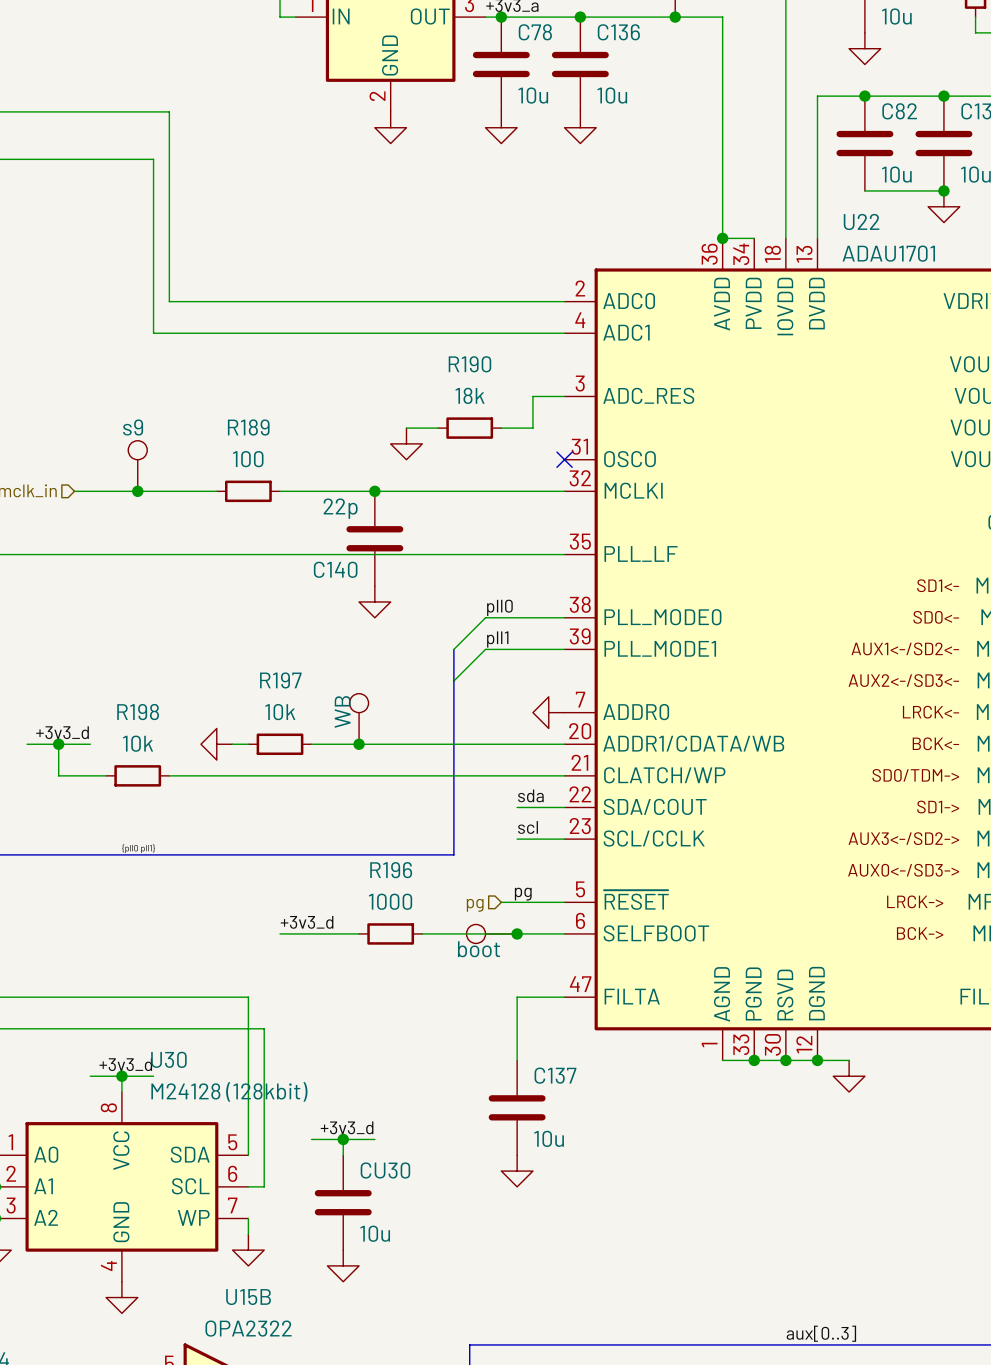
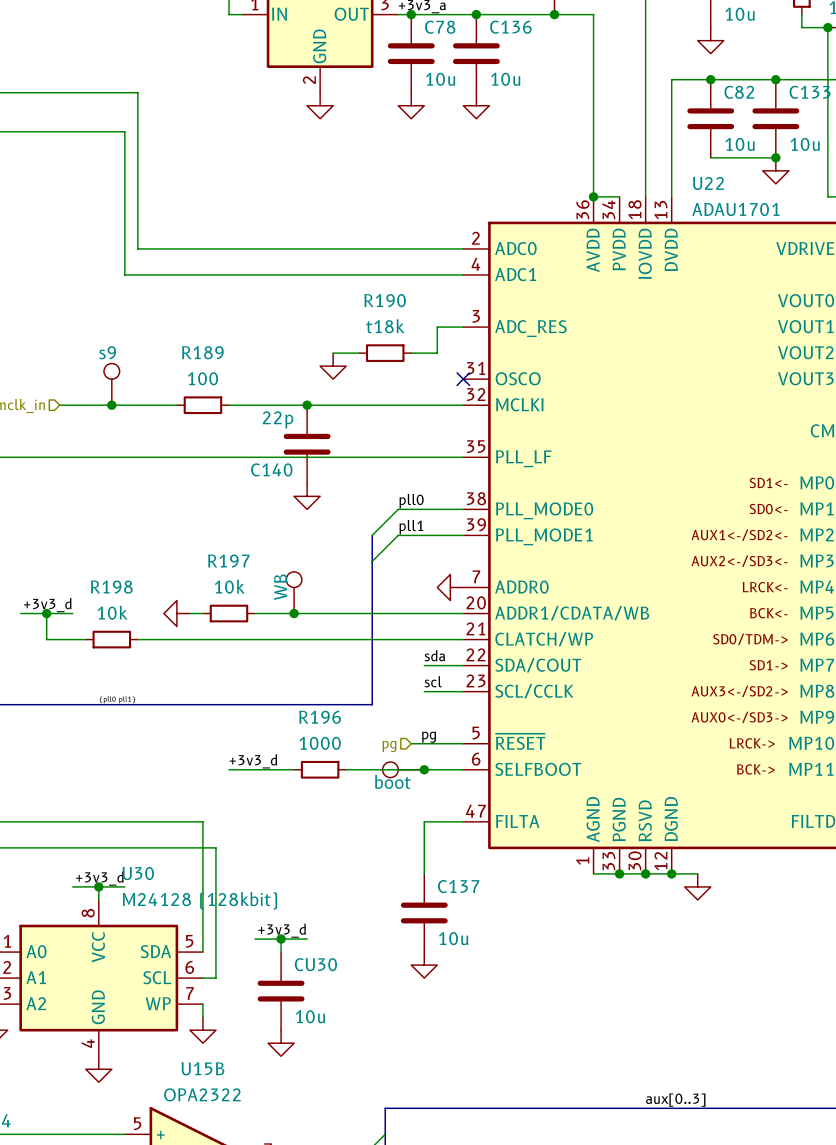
R190 value: 18k (470, 395) -> t18k (385, 326)

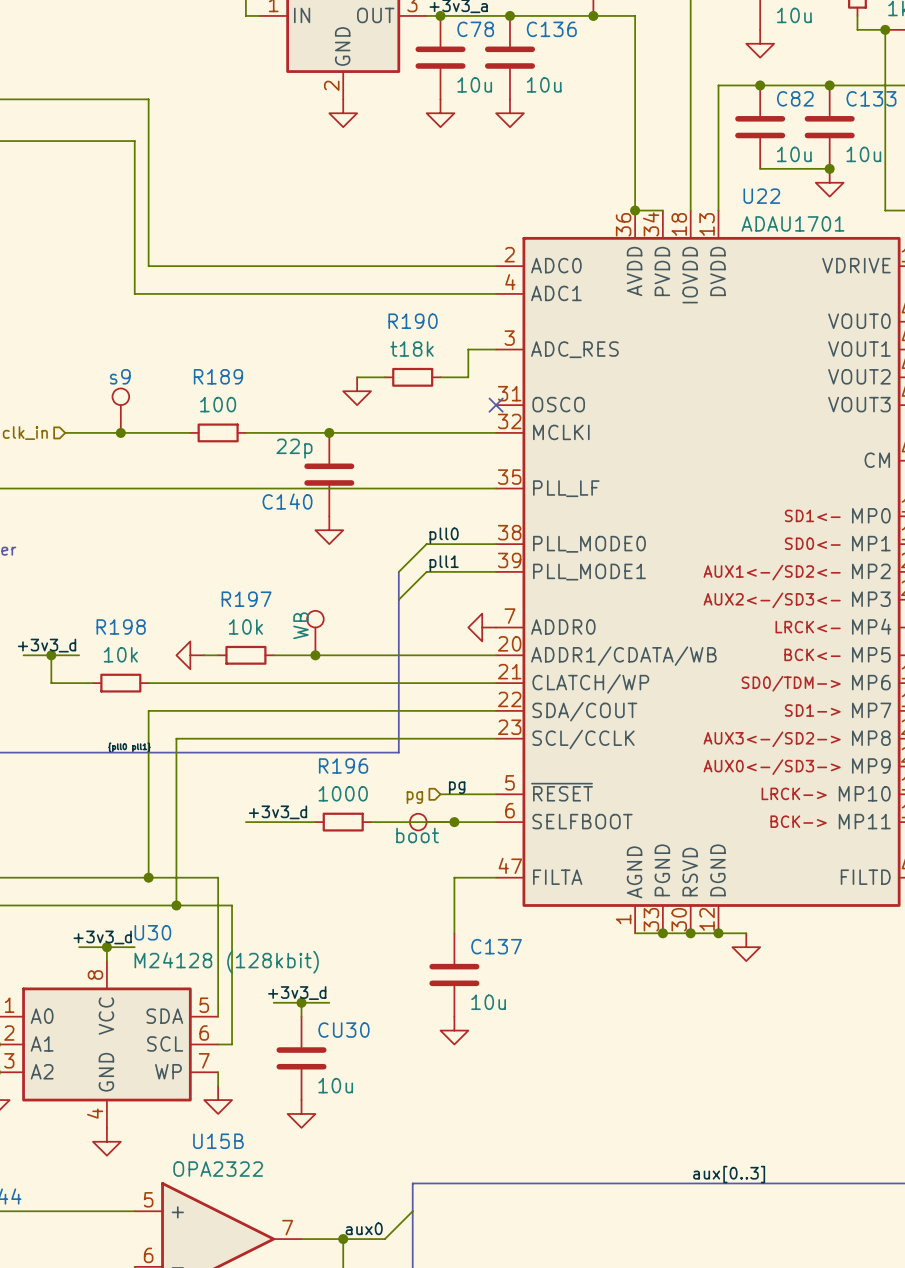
label: sda (434, 655) -> none
wire: none -> (454, 710) (148, 710) (148, 877)
label: scl (433, 681) -> none
wire: none -> (454, 738) (176, 738) (176, 905)
junction: none -> (148, 877)
junction: none -> (176, 905)

